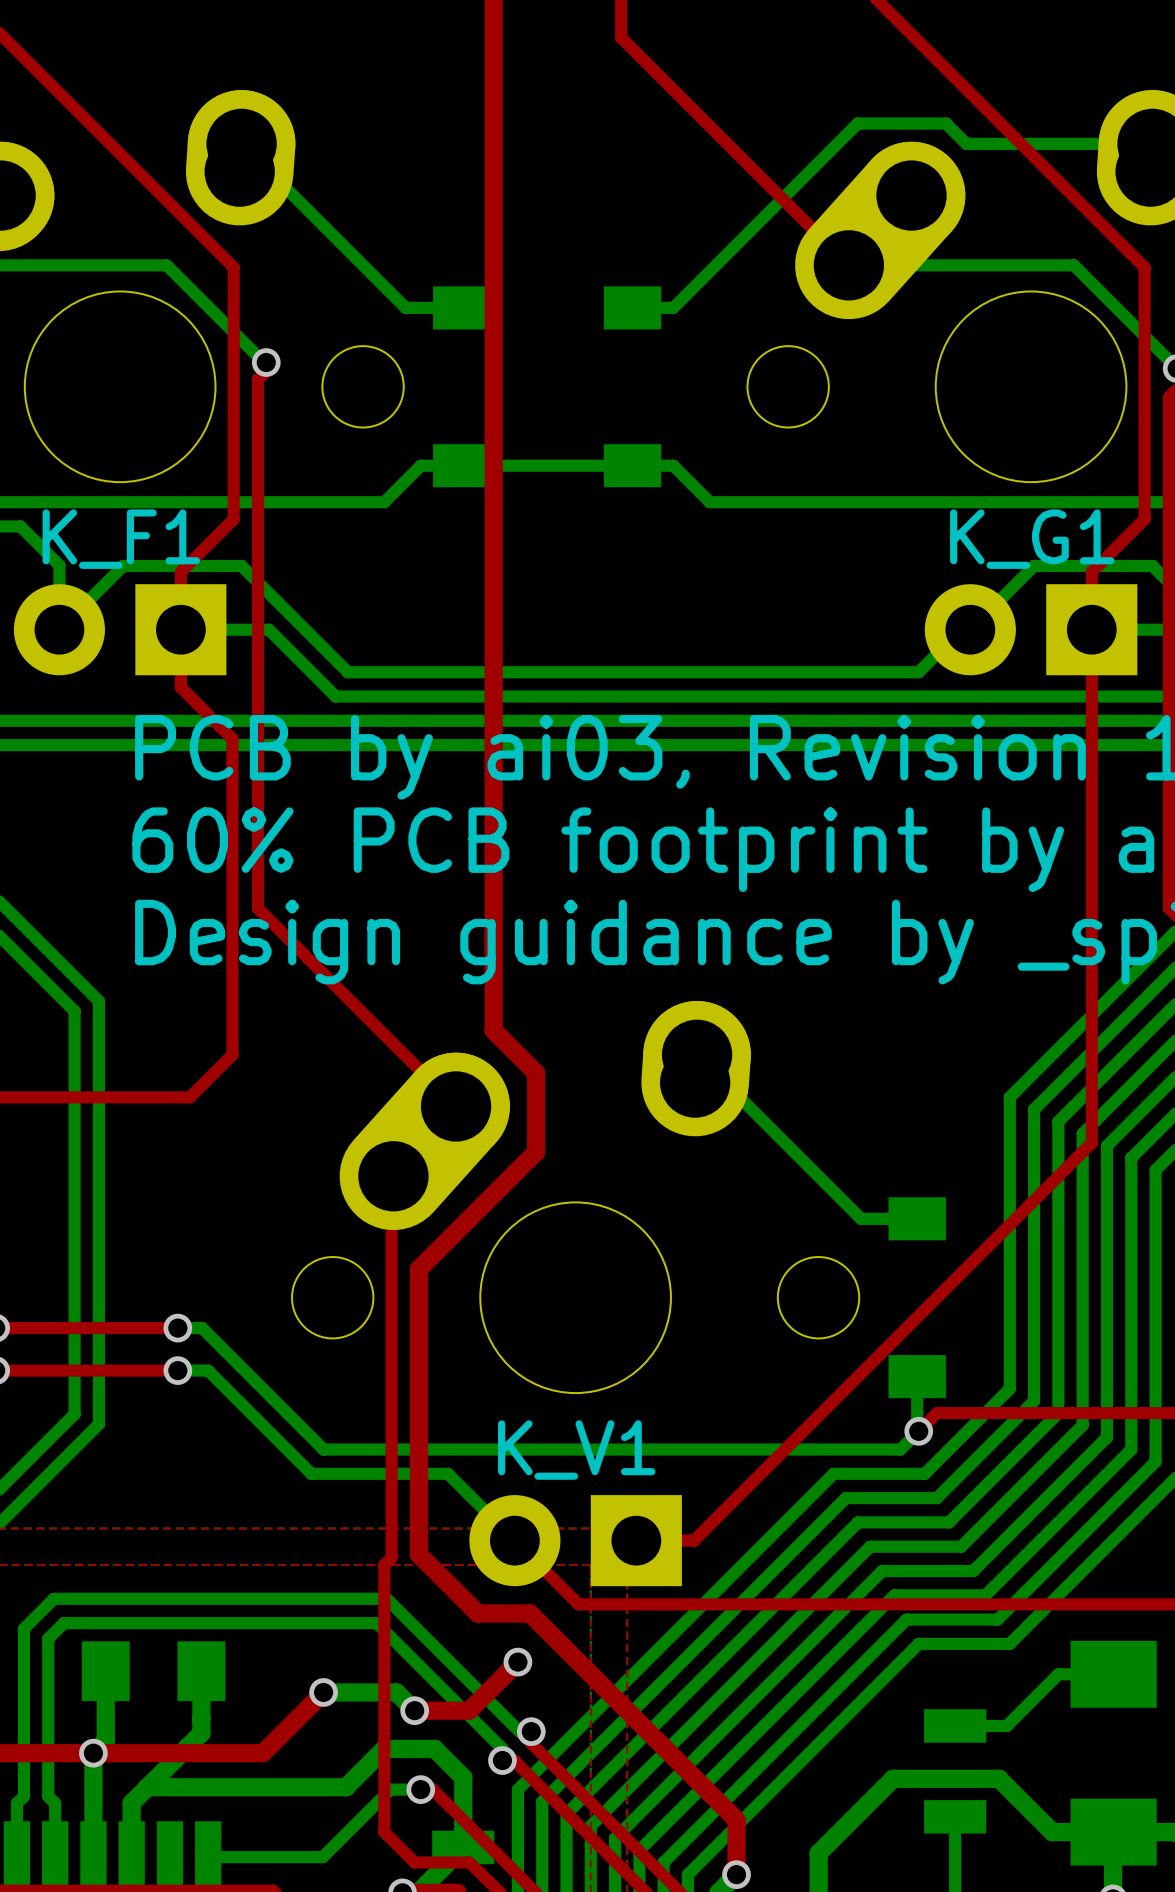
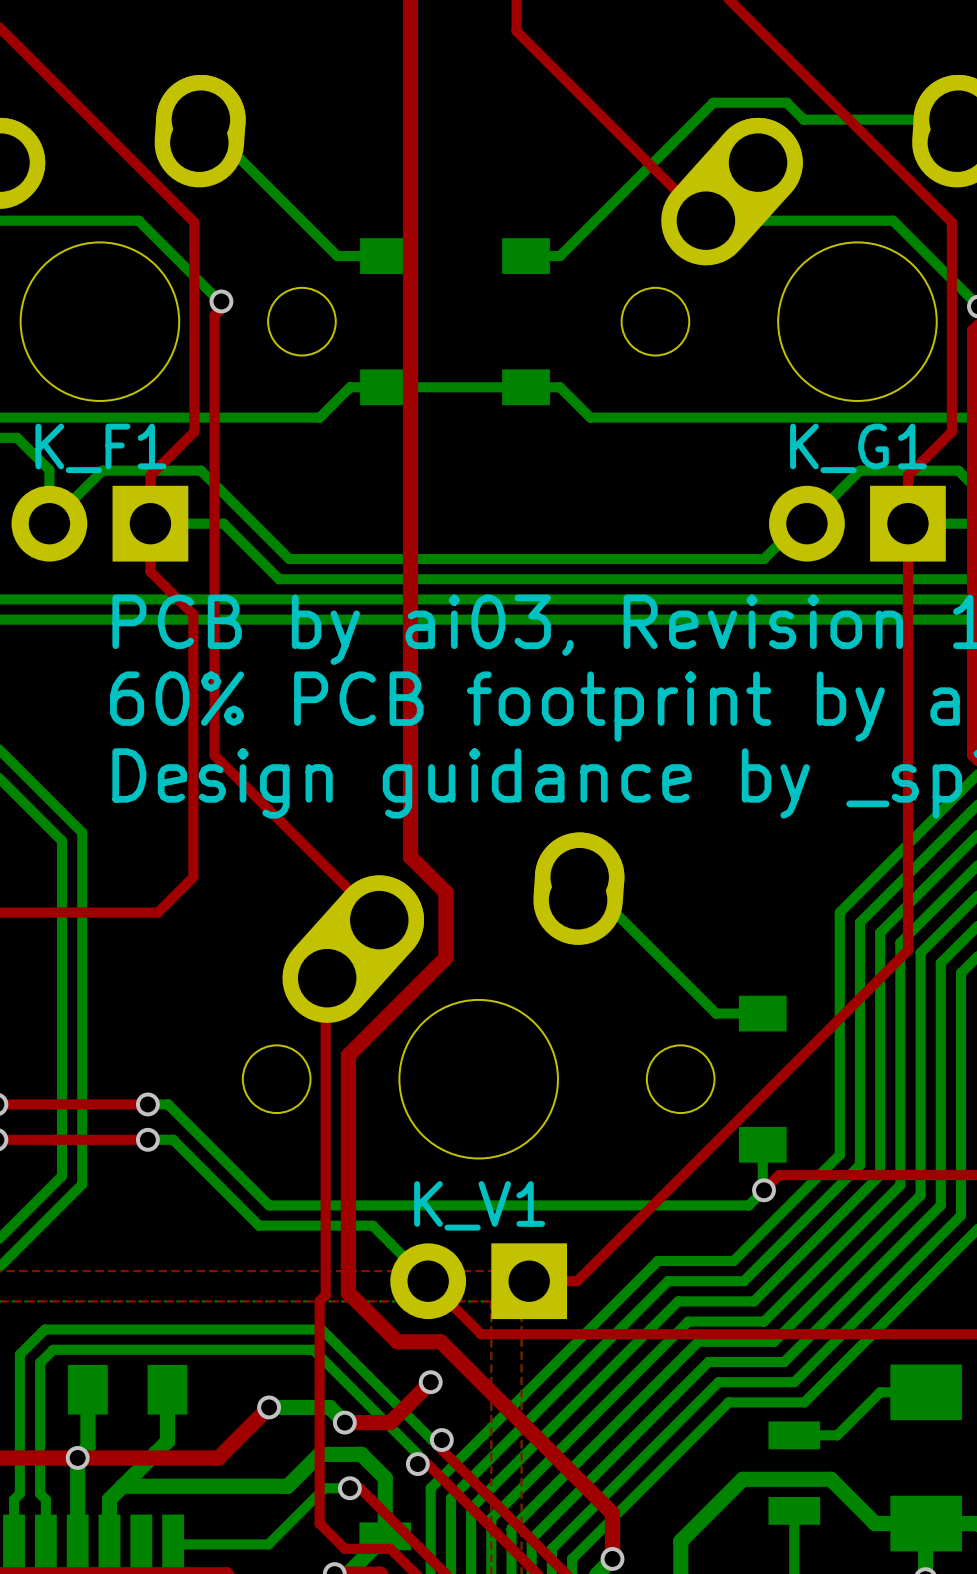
bottom track: (924, 1473) (833, 1473) (791, 1516) -> (769, 1225) (733, 1261) (657, 1261)
bottom track: (936, 1498) (845, 1498) (803, 1540) -> (779, 1245) (743, 1281) (668, 1281)
bottom track: (949, 1522) (857, 1522) (815, 1564) -> (789, 1266) (753, 1301) (678, 1301)
bottom track: (961, 1546) (870, 1546) (827, 1589) -> (799, 1286) (764, 1321) (688, 1321)
bottom track: (973, 1571) (882, 1571) (839, 1613) -> (809, 1306) (774, 1341) (698, 1341)
bottom track: (985, 1595) (894, 1595) (851, 1637) -> (819, 1326) (784, 1362) (708, 1362)
bottom track: (997, 1619) (906, 1619) (864, 1662) -> (829, 1346) (794, 1382) (718, 1382)
bottom track: (1009, 1643) (918, 1643) (876, 1686) -> (839, 1367) (804, 1402) (728, 1402)

